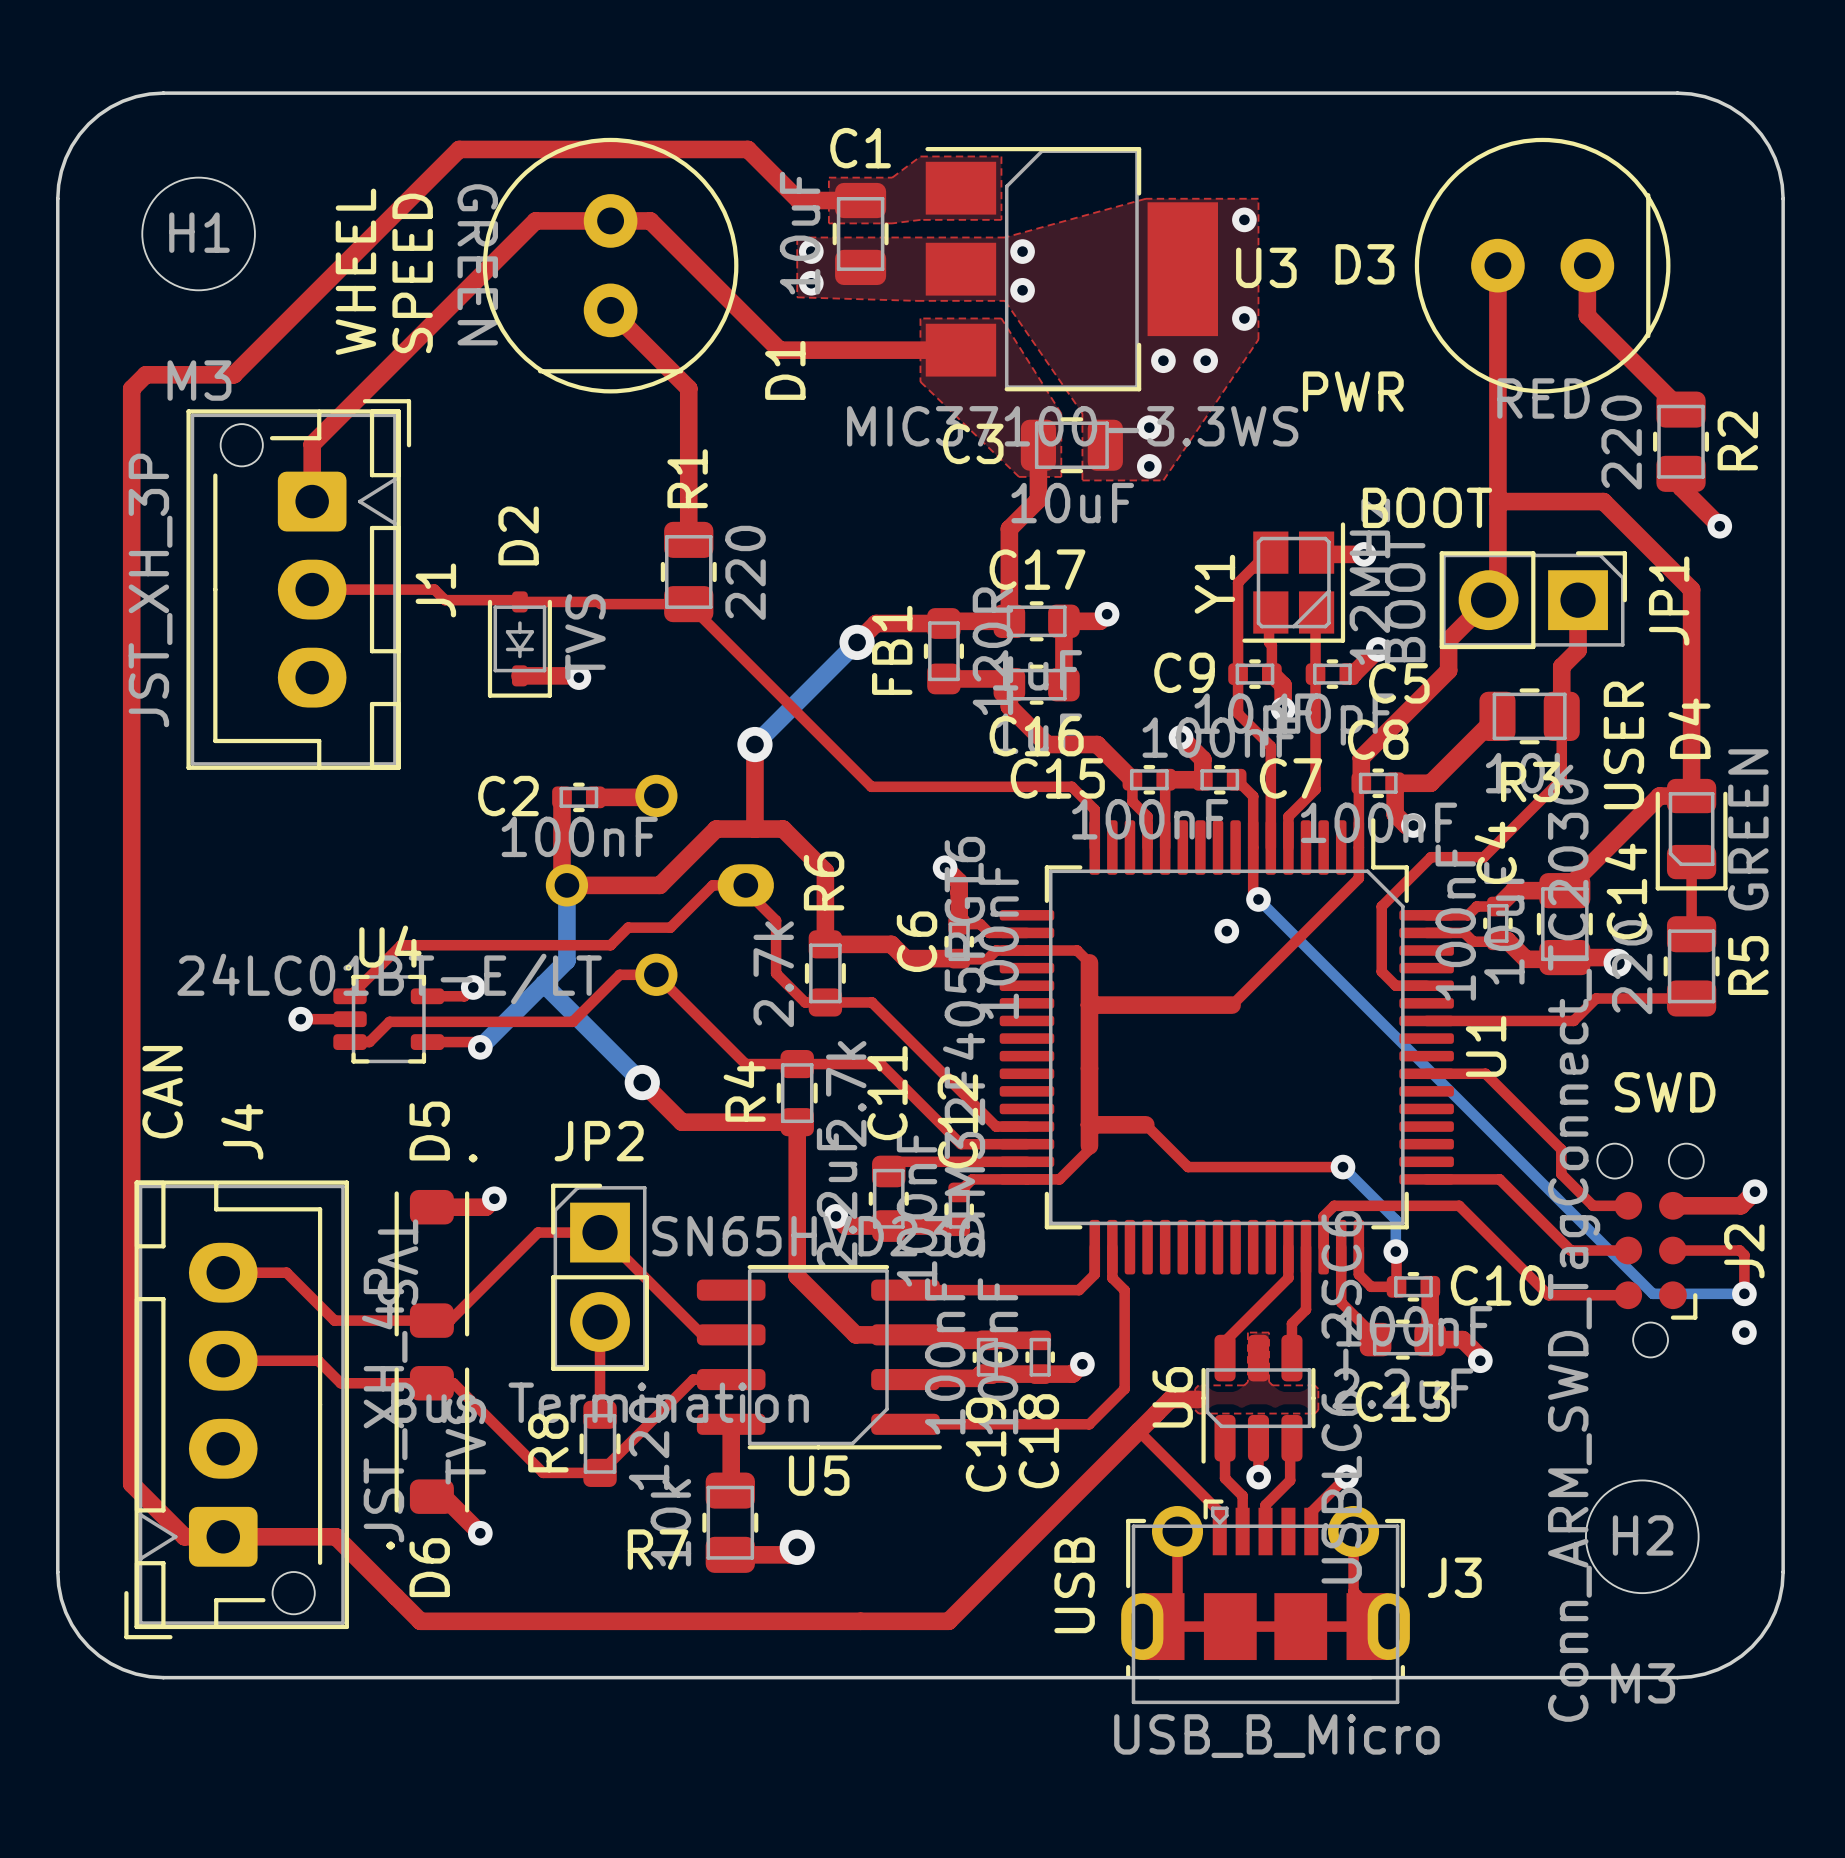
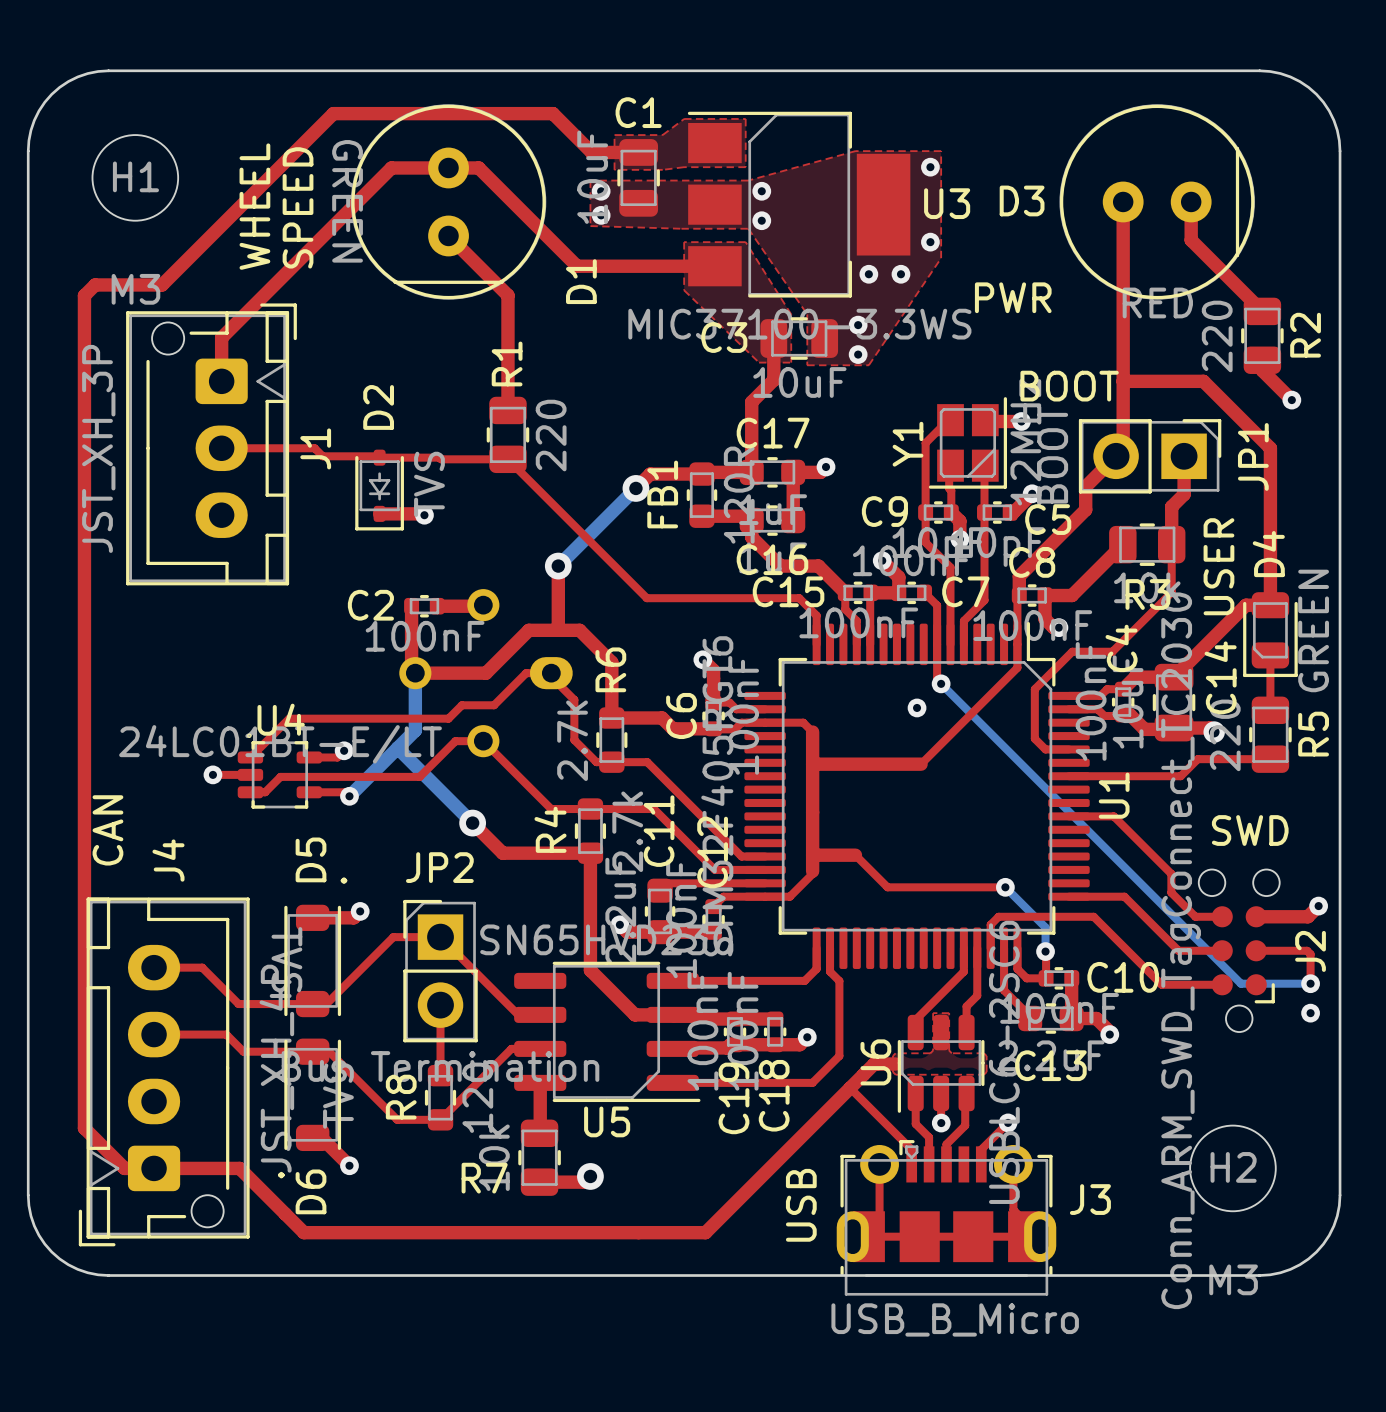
D1 footprint: [482, 137, 739, 394] -> [350, 104, 547, 300]
D3 footprint: [1414, 137, 1671, 394] -> [1059, 104, 1255, 300]
D5 footprint: [394, 1189, 470, 1338] -> [284, 904, 342, 1018]
D6 footprint: [394, 1366, 470, 1514] -> [284, 1038, 342, 1152]

